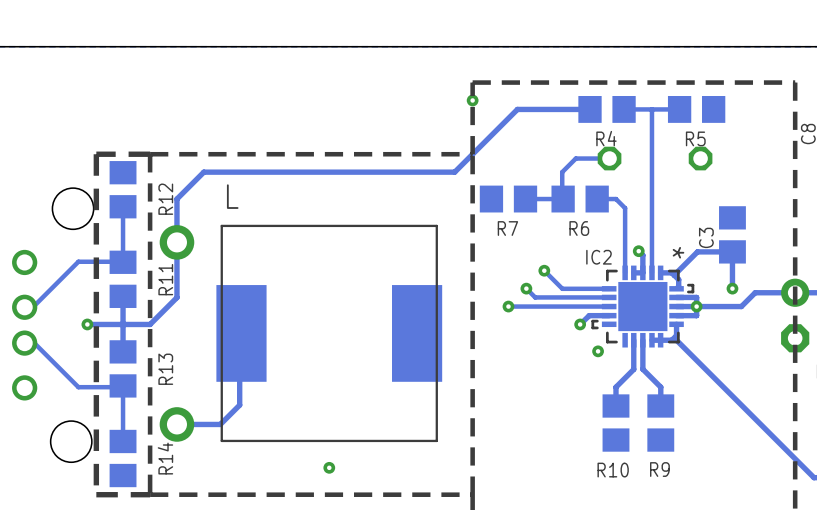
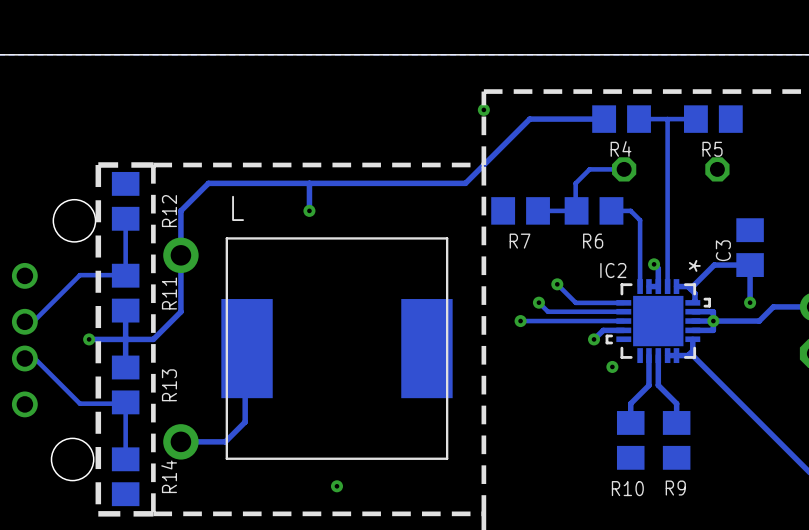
track: none -> (309, 183) (309, 210)
via: none -> (309, 210)

